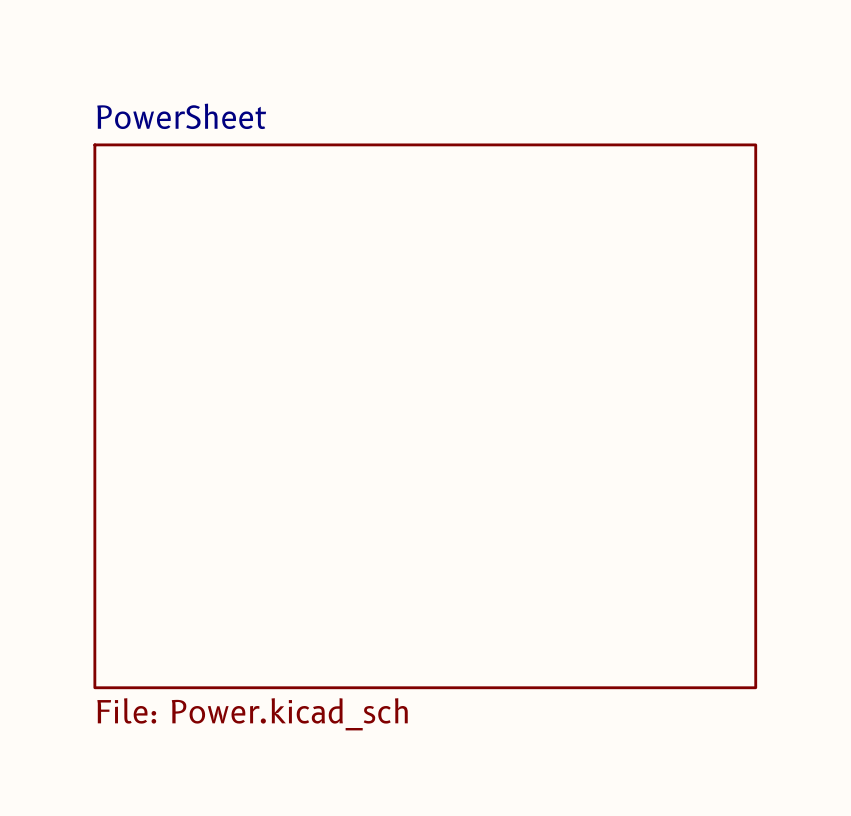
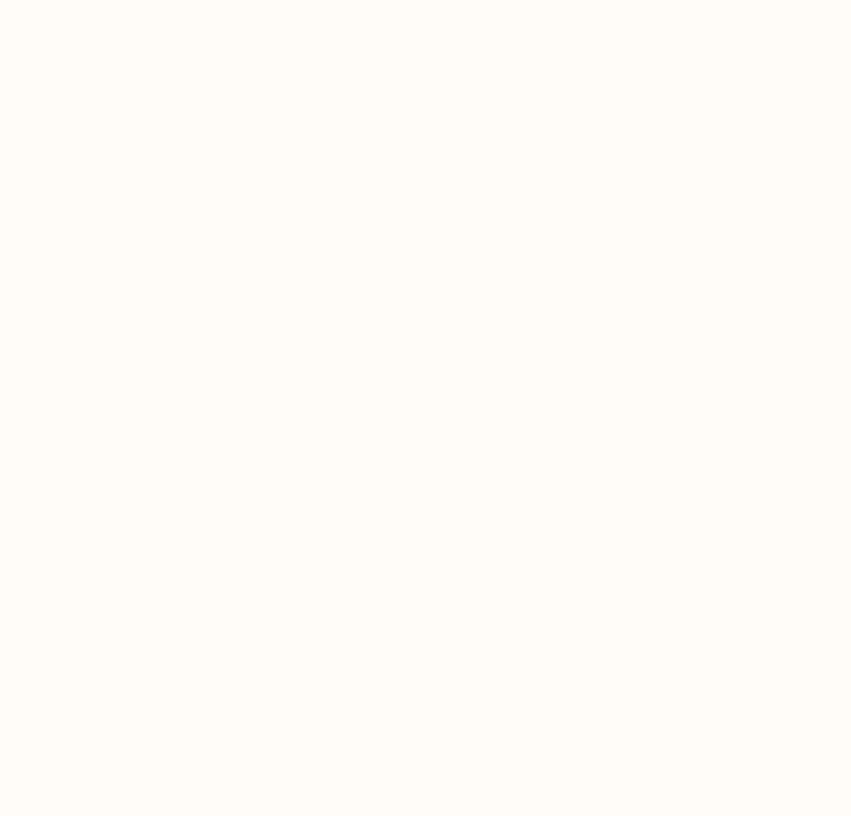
sheet PowerSheet: File: Power.kicad_sch (425, 416) -> none

